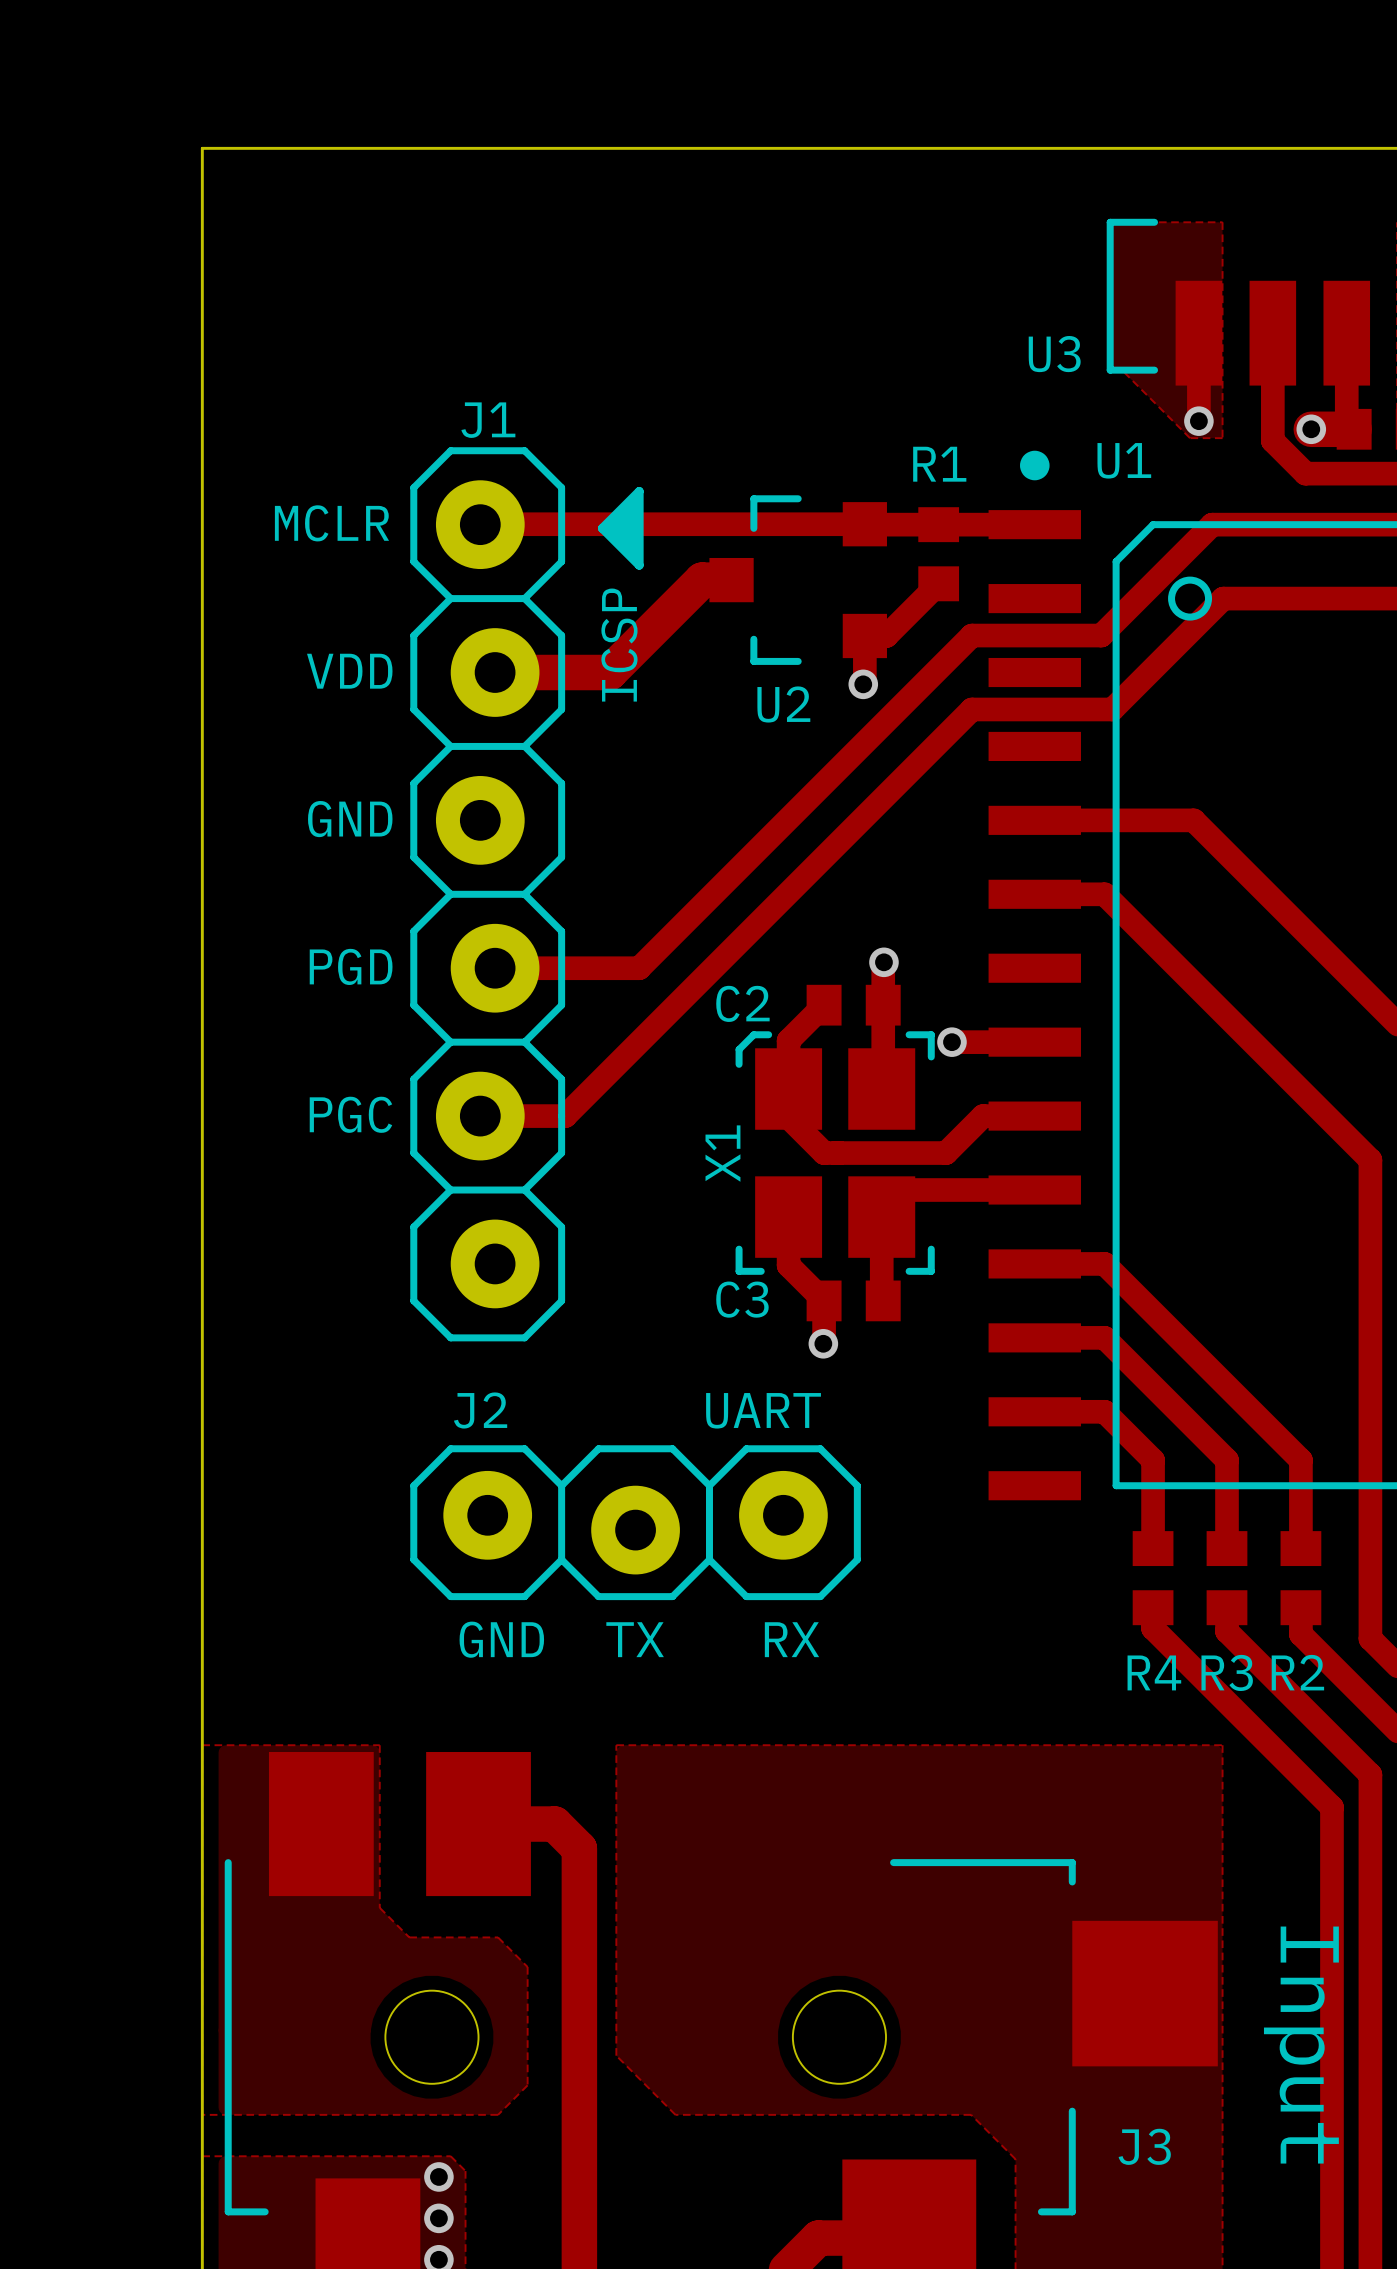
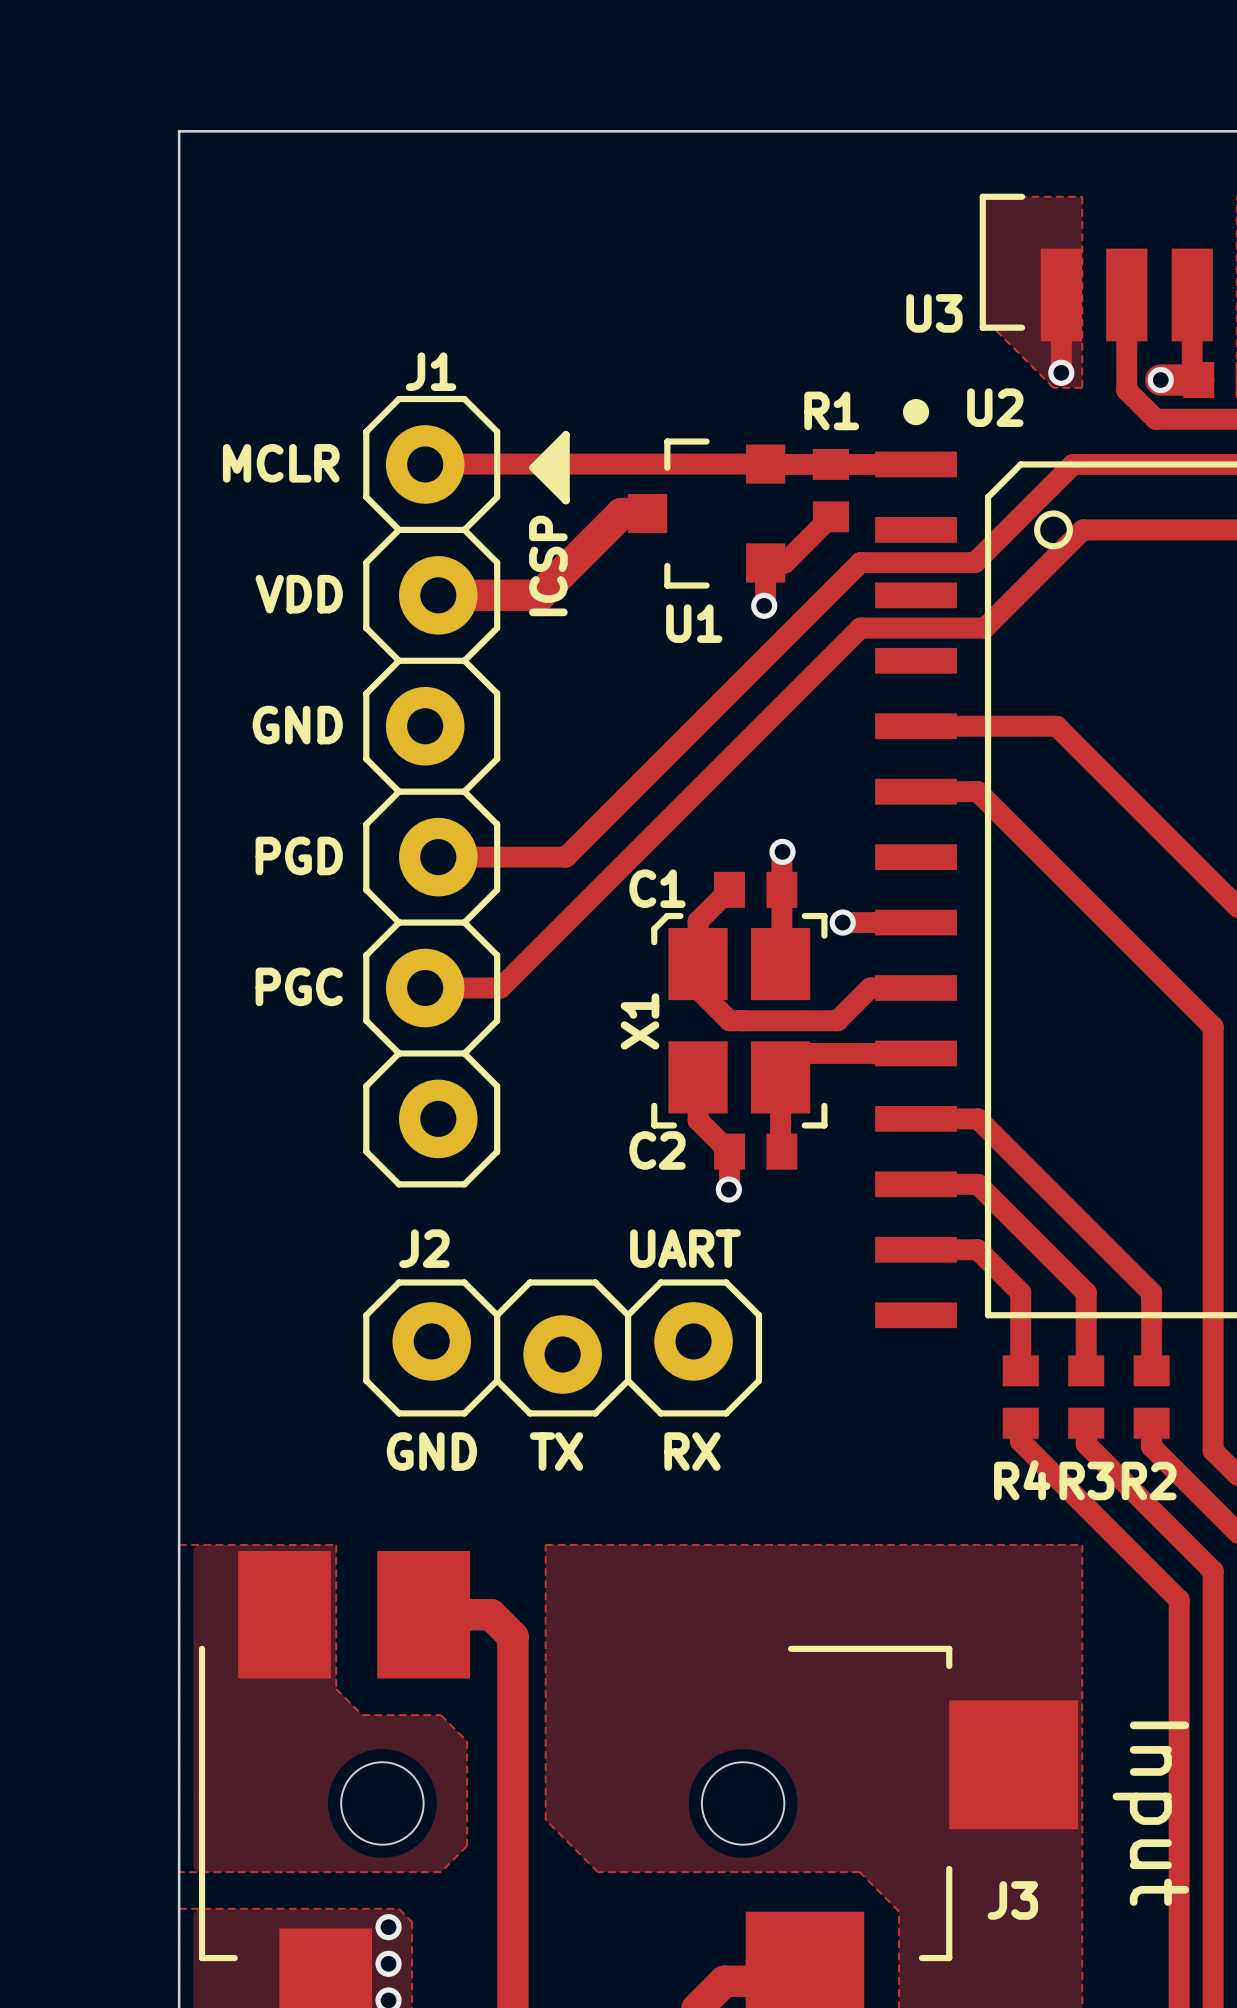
U1 name: U1 (1124, 460) -> U2 (995, 407)
U2 name: U2 (783, 704) -> U1 (694, 623)
C2 name: C2 (742, 1003) -> C1 (657, 888)
C3 name: C3 (742, 1299) -> C2 (657, 1150)

